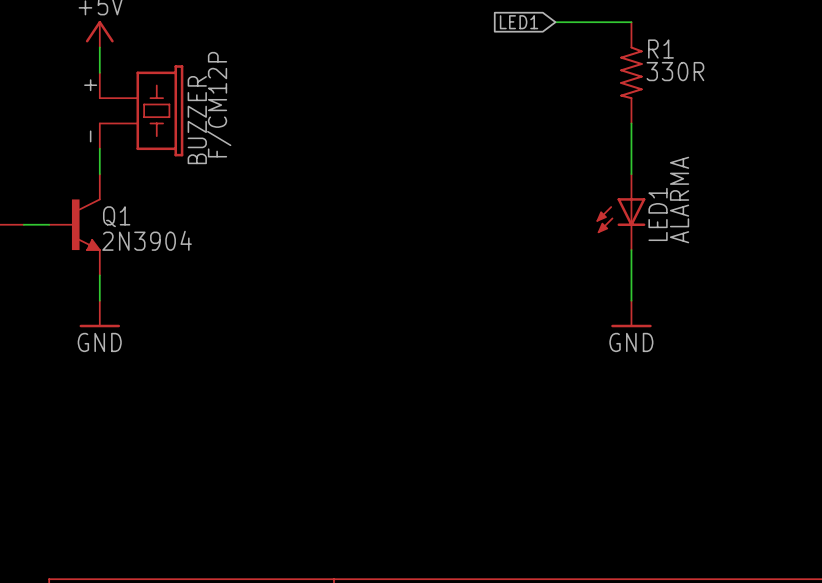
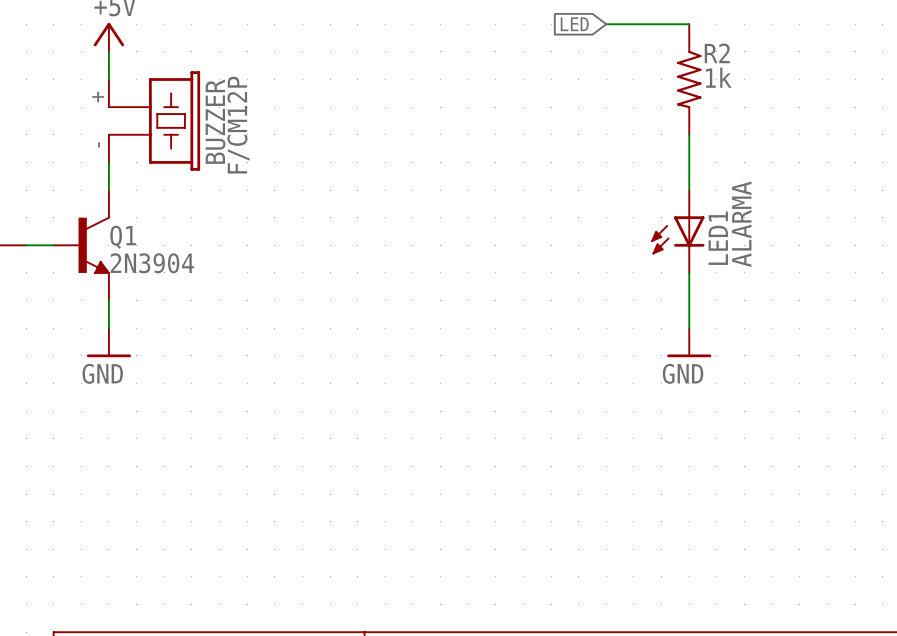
global label: LED1 (519, 22) -> LED (574, 24)
R1 name: R1 (661, 49) -> R2 (717, 53)
R1 value: 330R (675, 71) -> 1k (718, 77)

